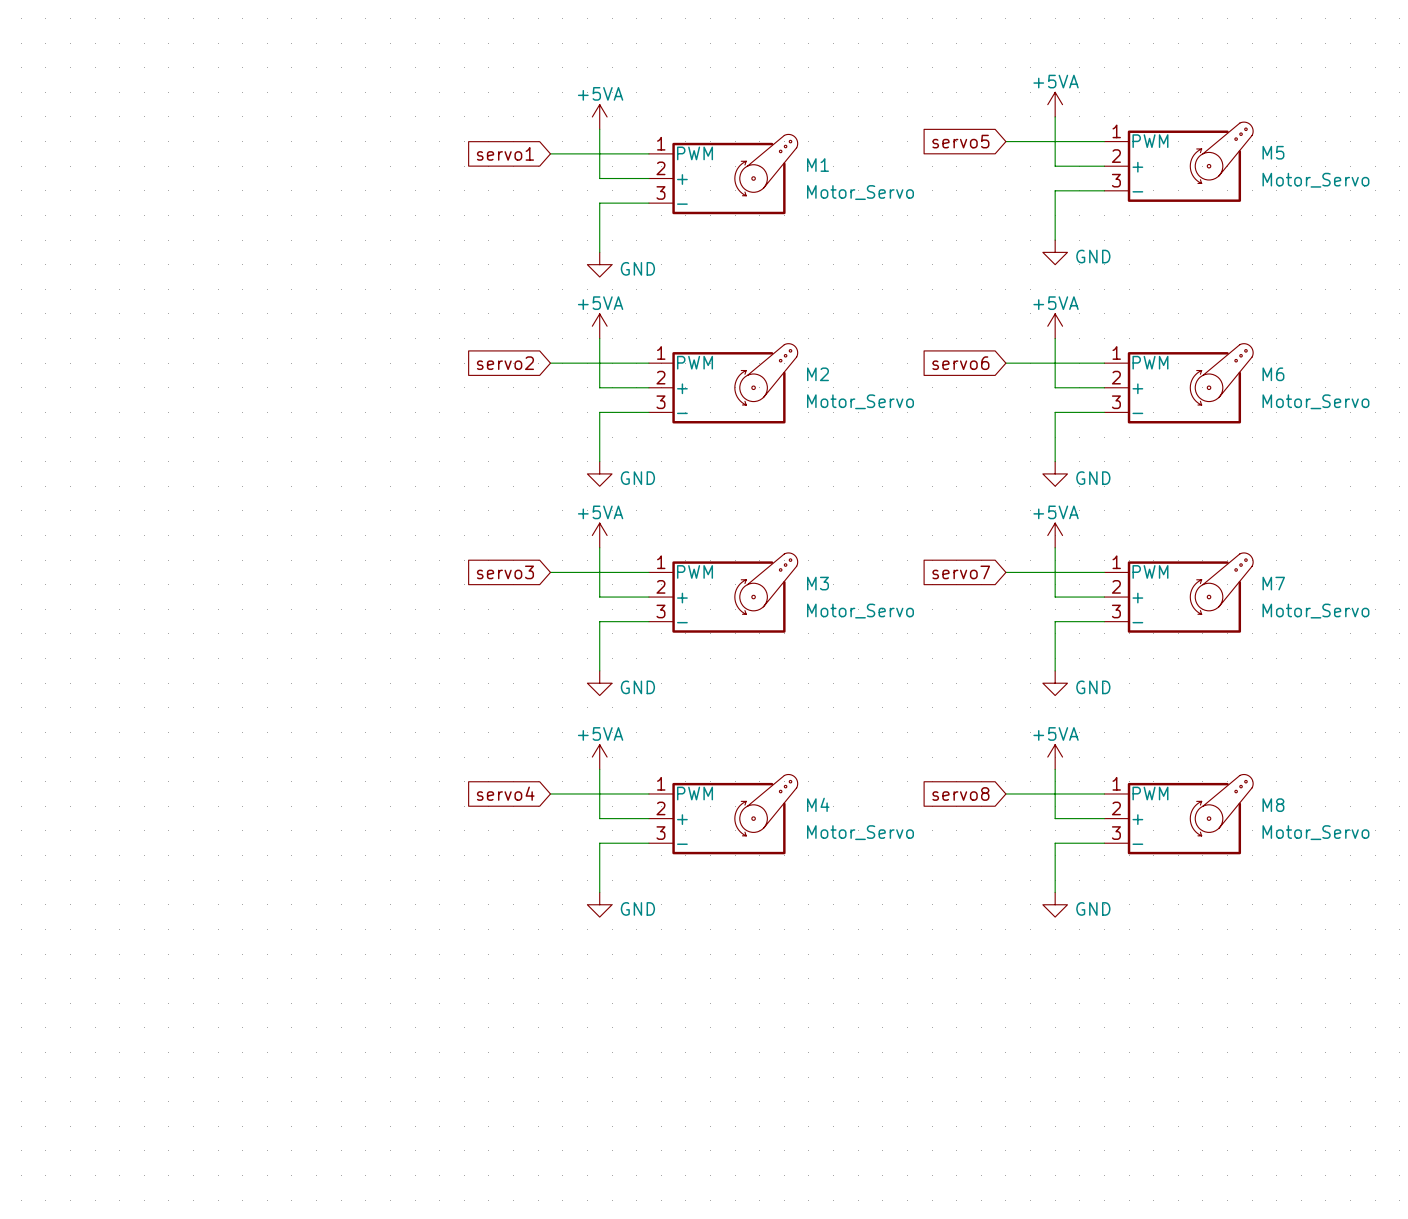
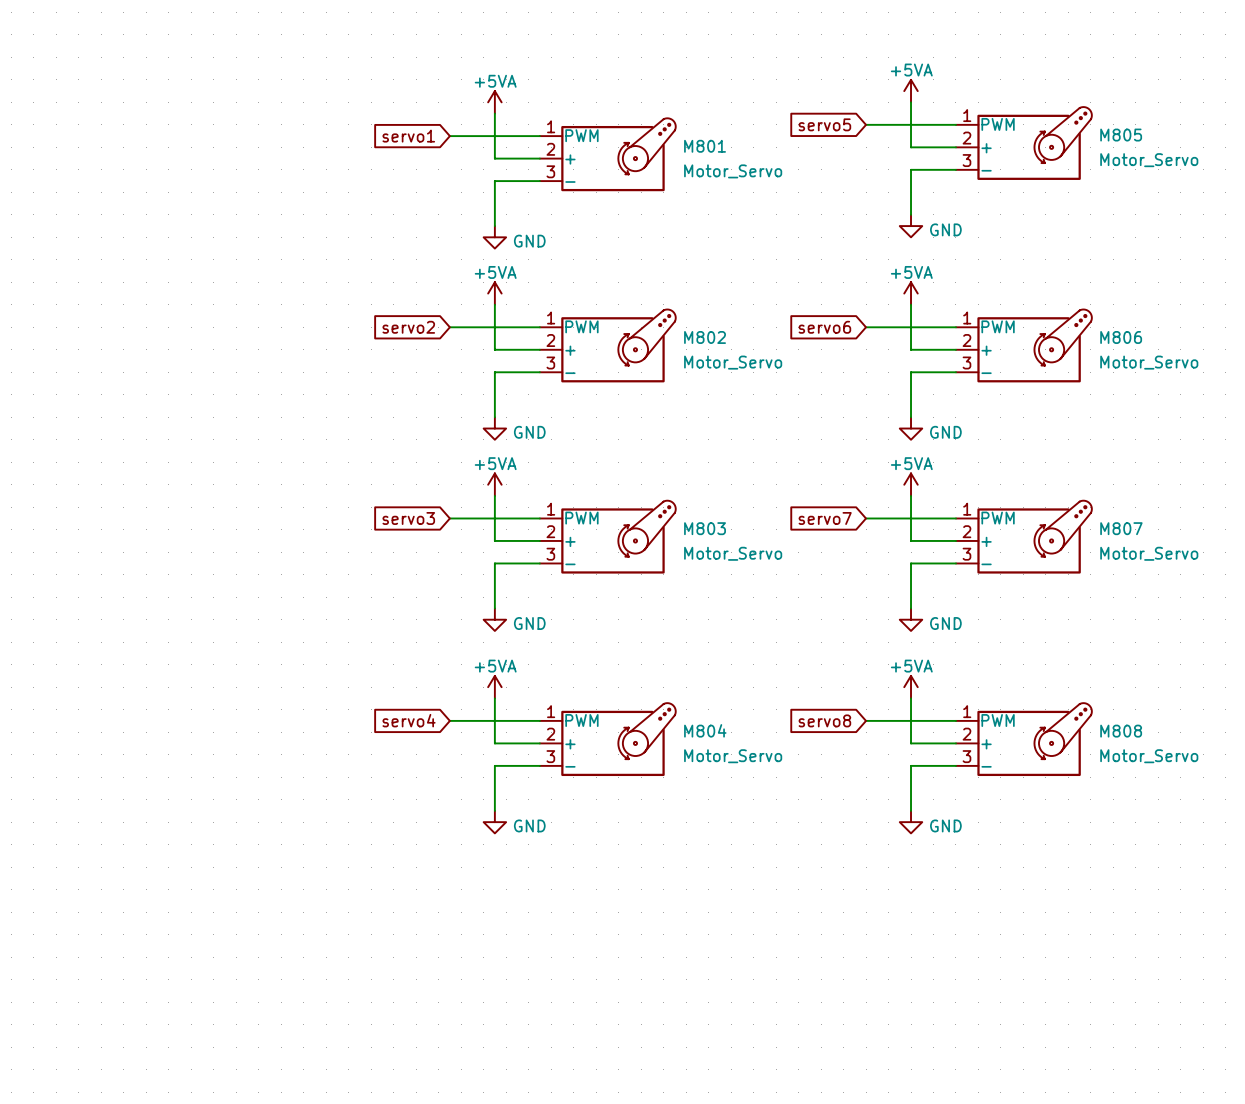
M5 name: M5 (1273, 152) -> M805 (1121, 135)
M1 name: M1 (817, 165) -> M801 (705, 146)
M2 name: M2 (817, 374) -> M802 (705, 337)
M6 name: M6 (1273, 374) -> M806 (1121, 337)
M3 name: M3 (817, 583) -> M803 (705, 528)
M7 name: M7 (1273, 583) -> M807 (1121, 528)
M4 name: M4 (818, 804) -> M804 (705, 730)
M8 name: M8 (1273, 805) -> M808 (1121, 731)

